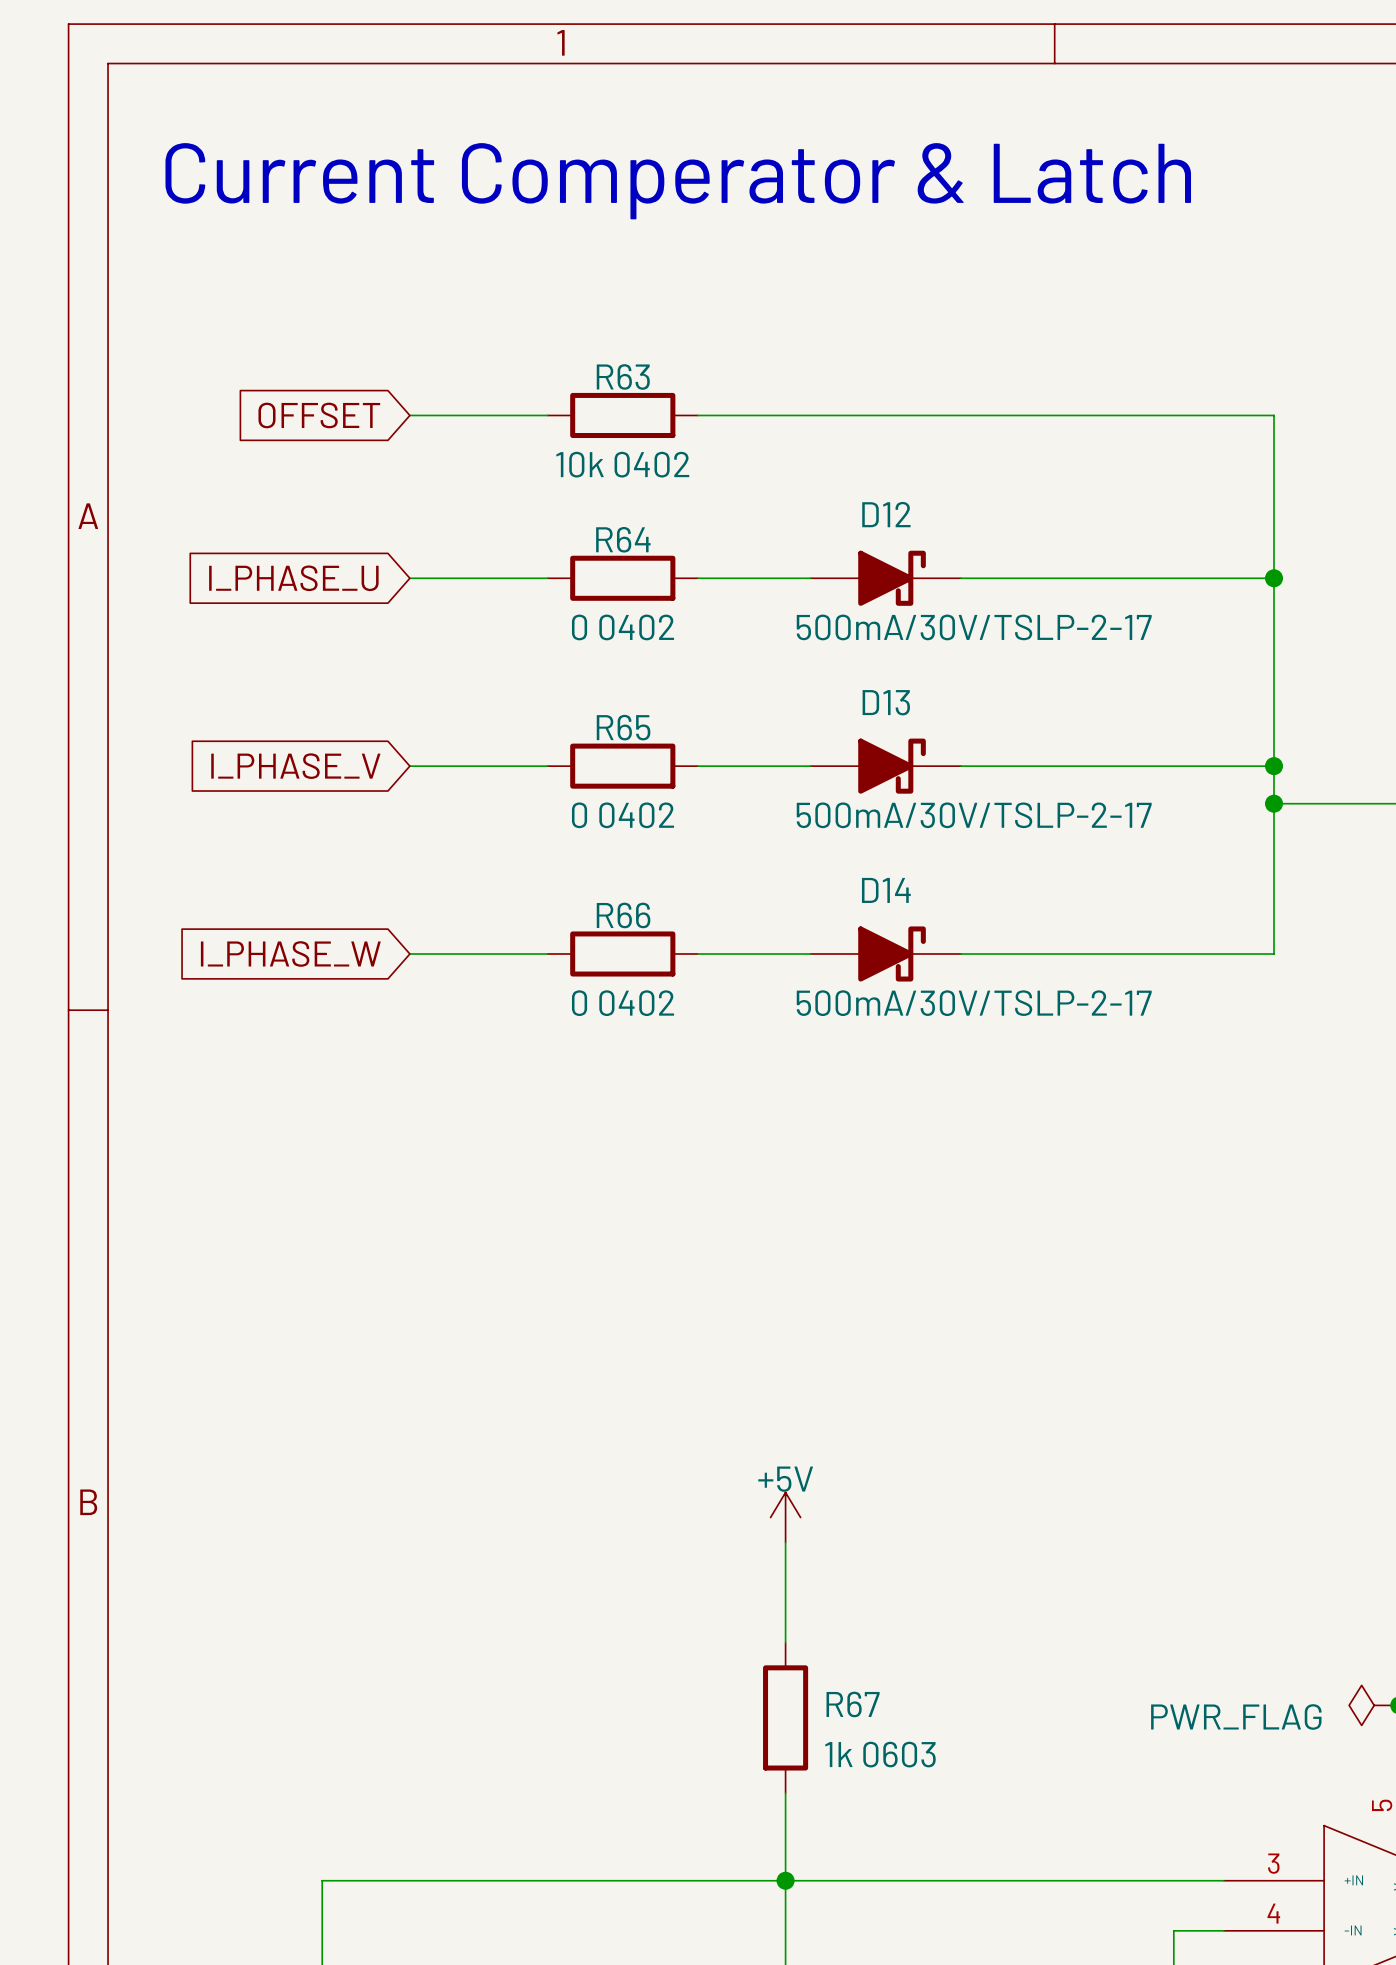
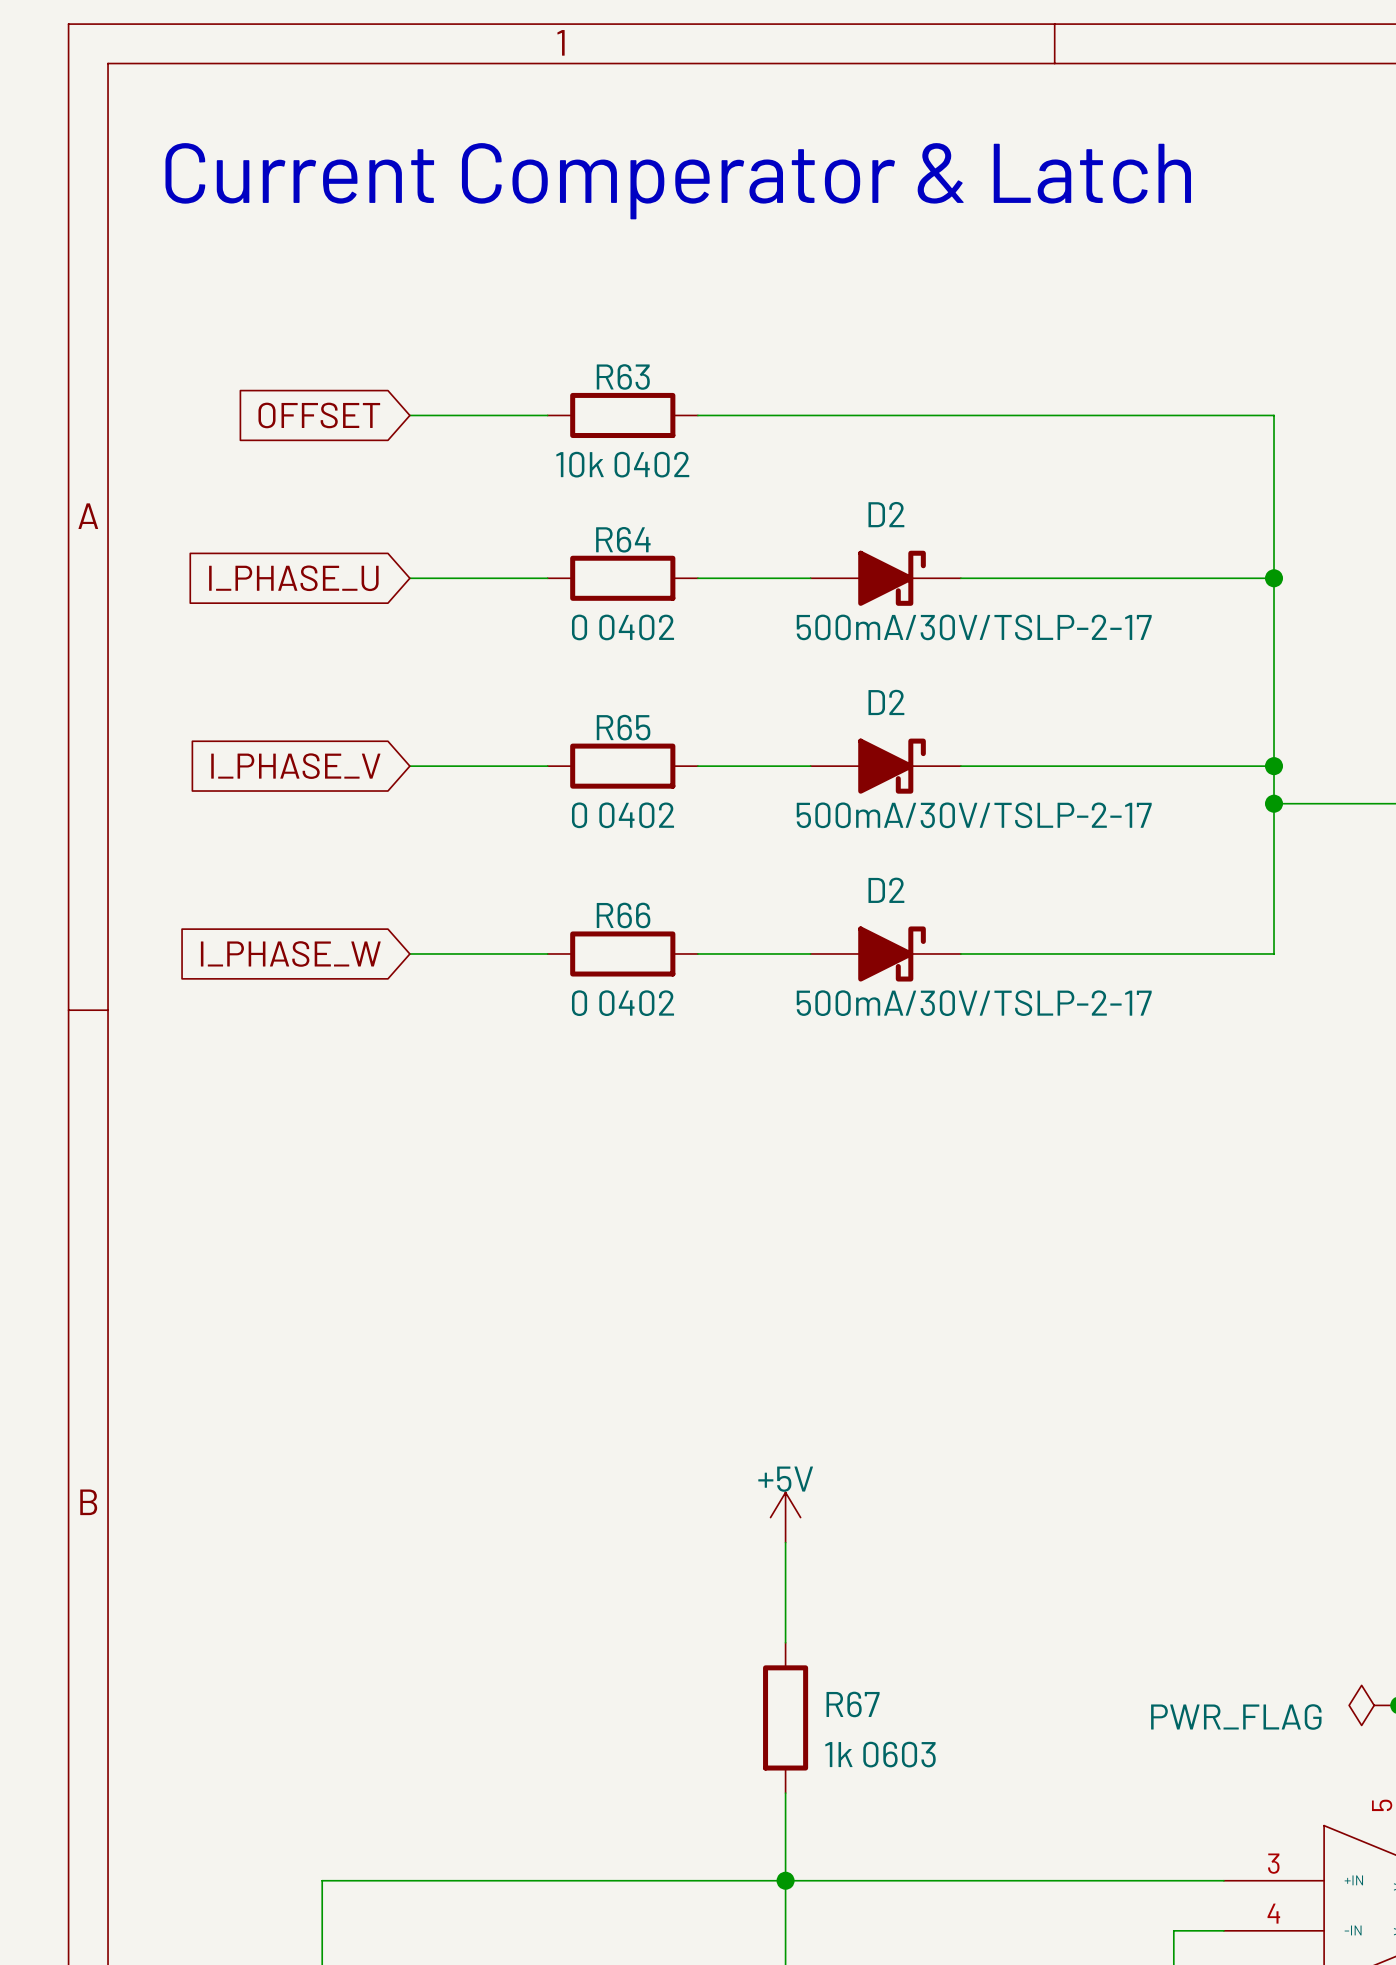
D12 name: D12 (886, 514) -> D2 (886, 514)
D13 name: D13 (886, 702) -> D2 (886, 702)
D14 name: D14 (886, 890) -> D2 (886, 890)

